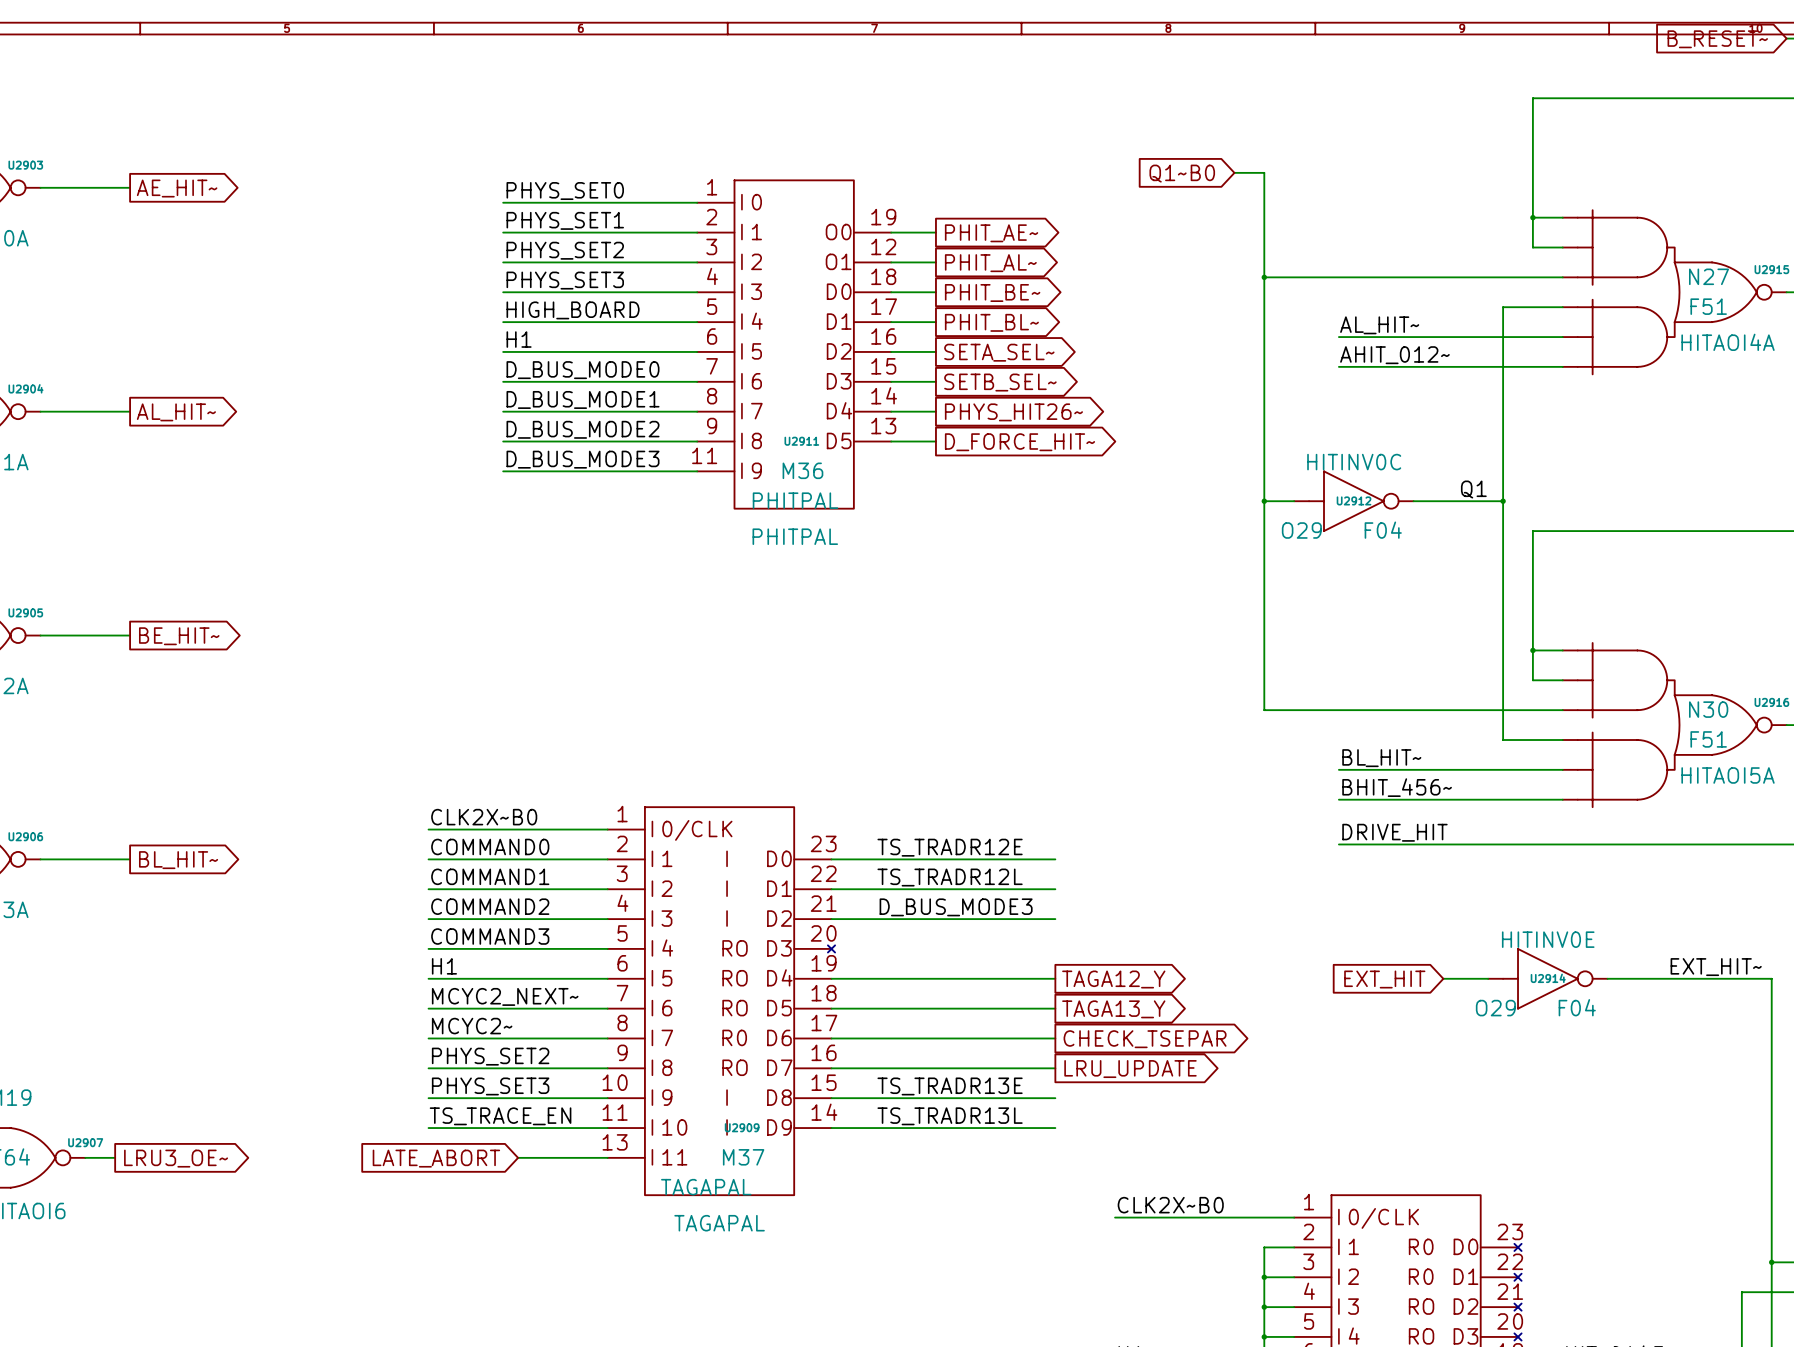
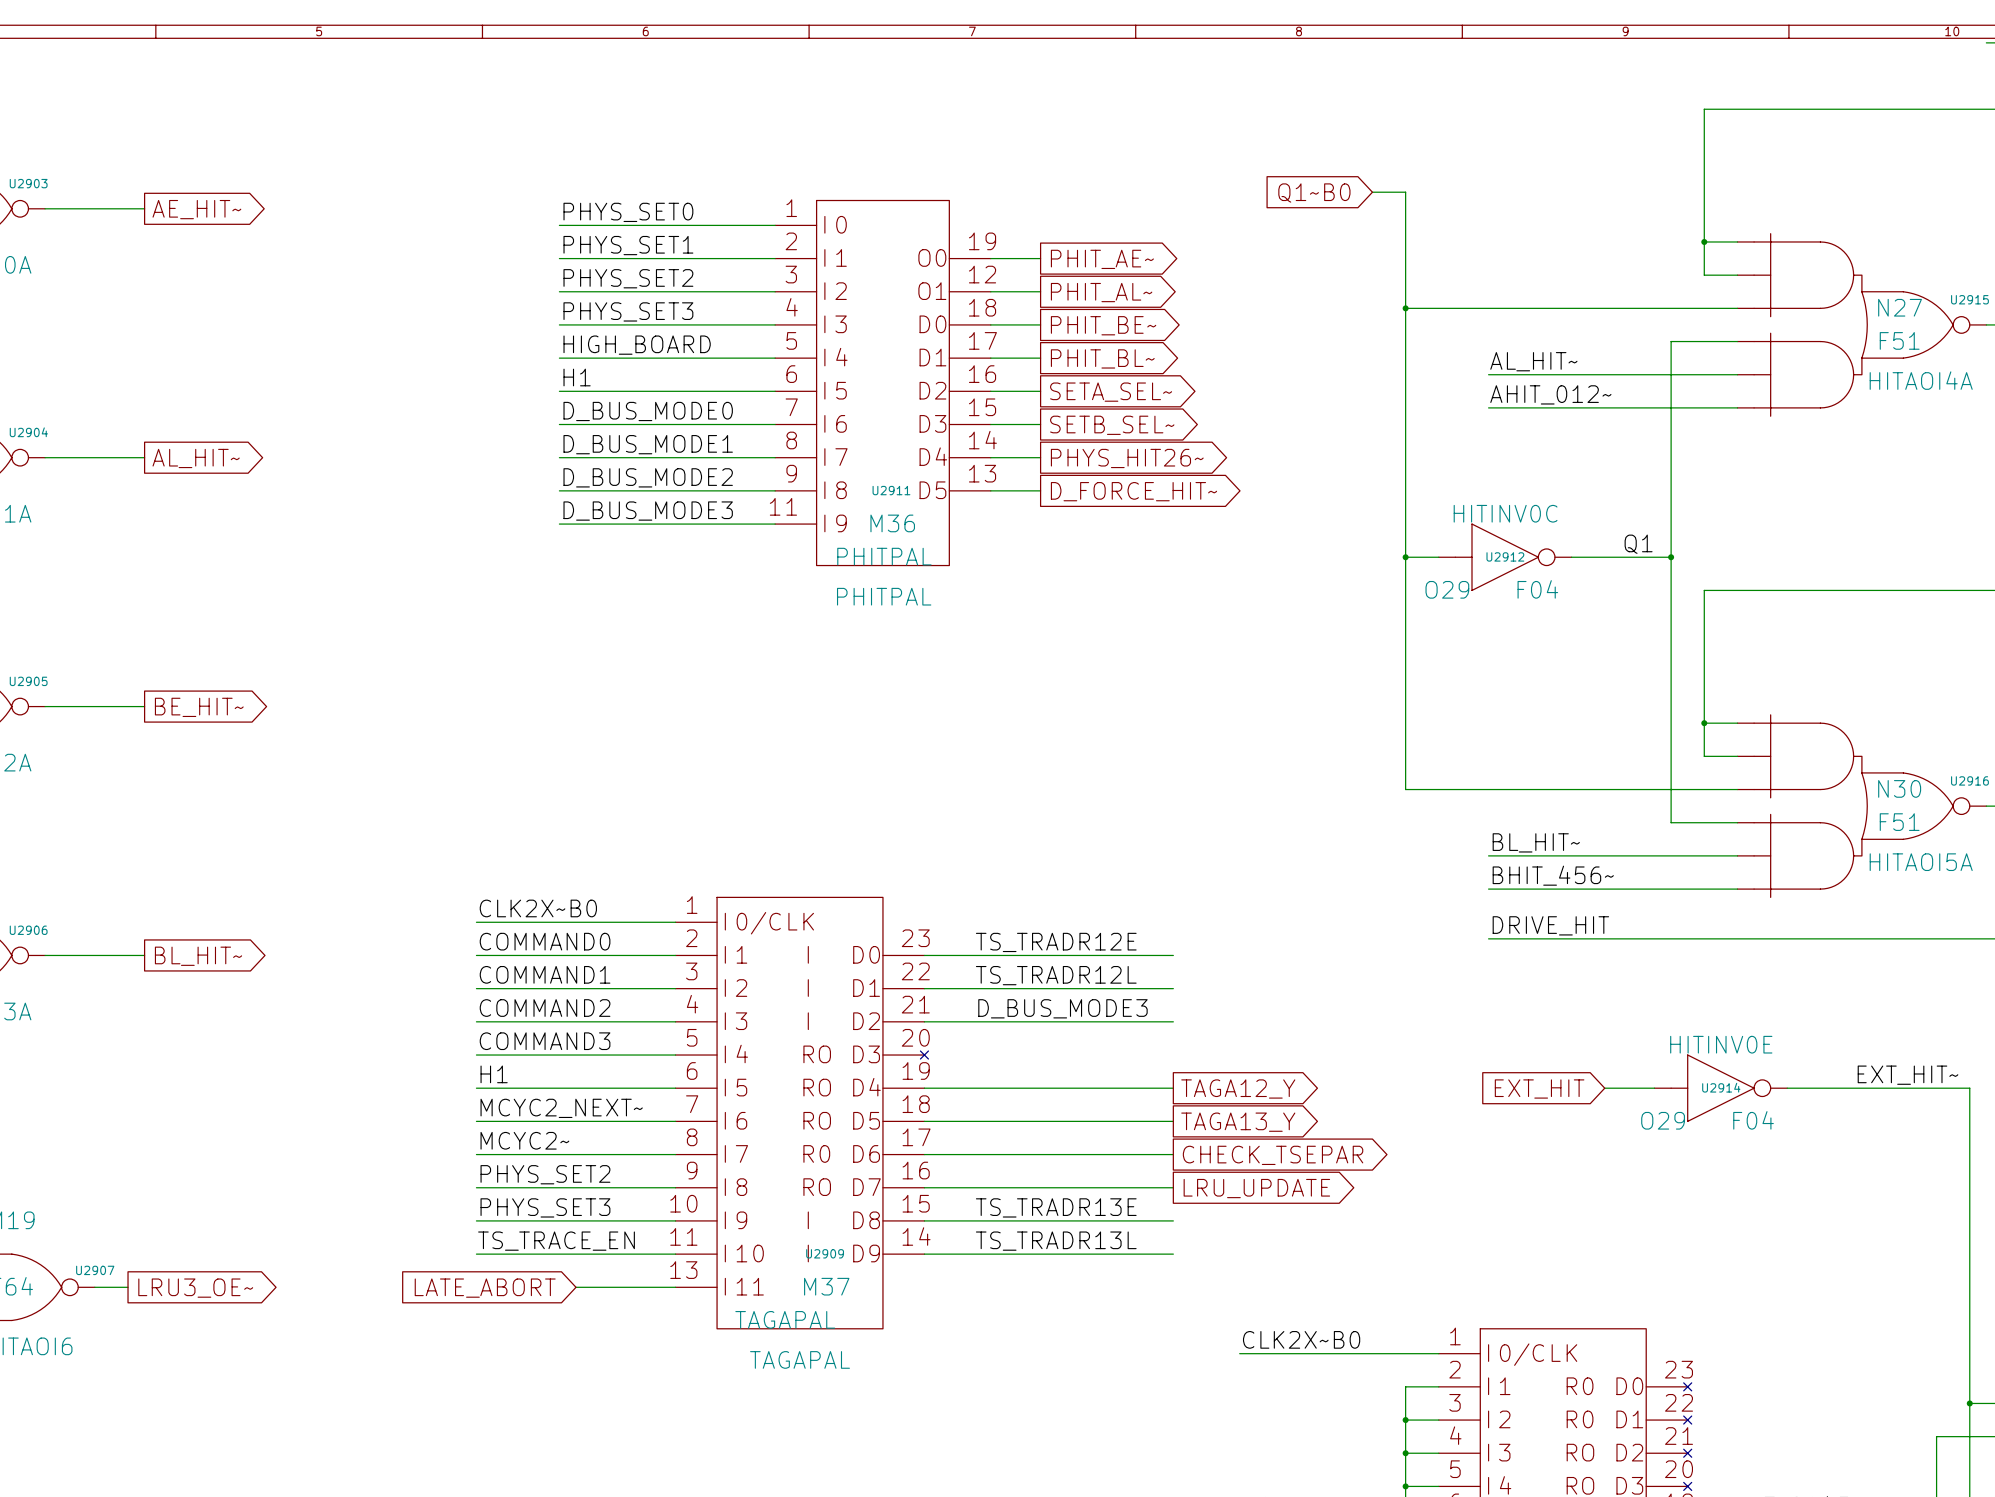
global label: B_RESET~ (1717, 39) -> none

